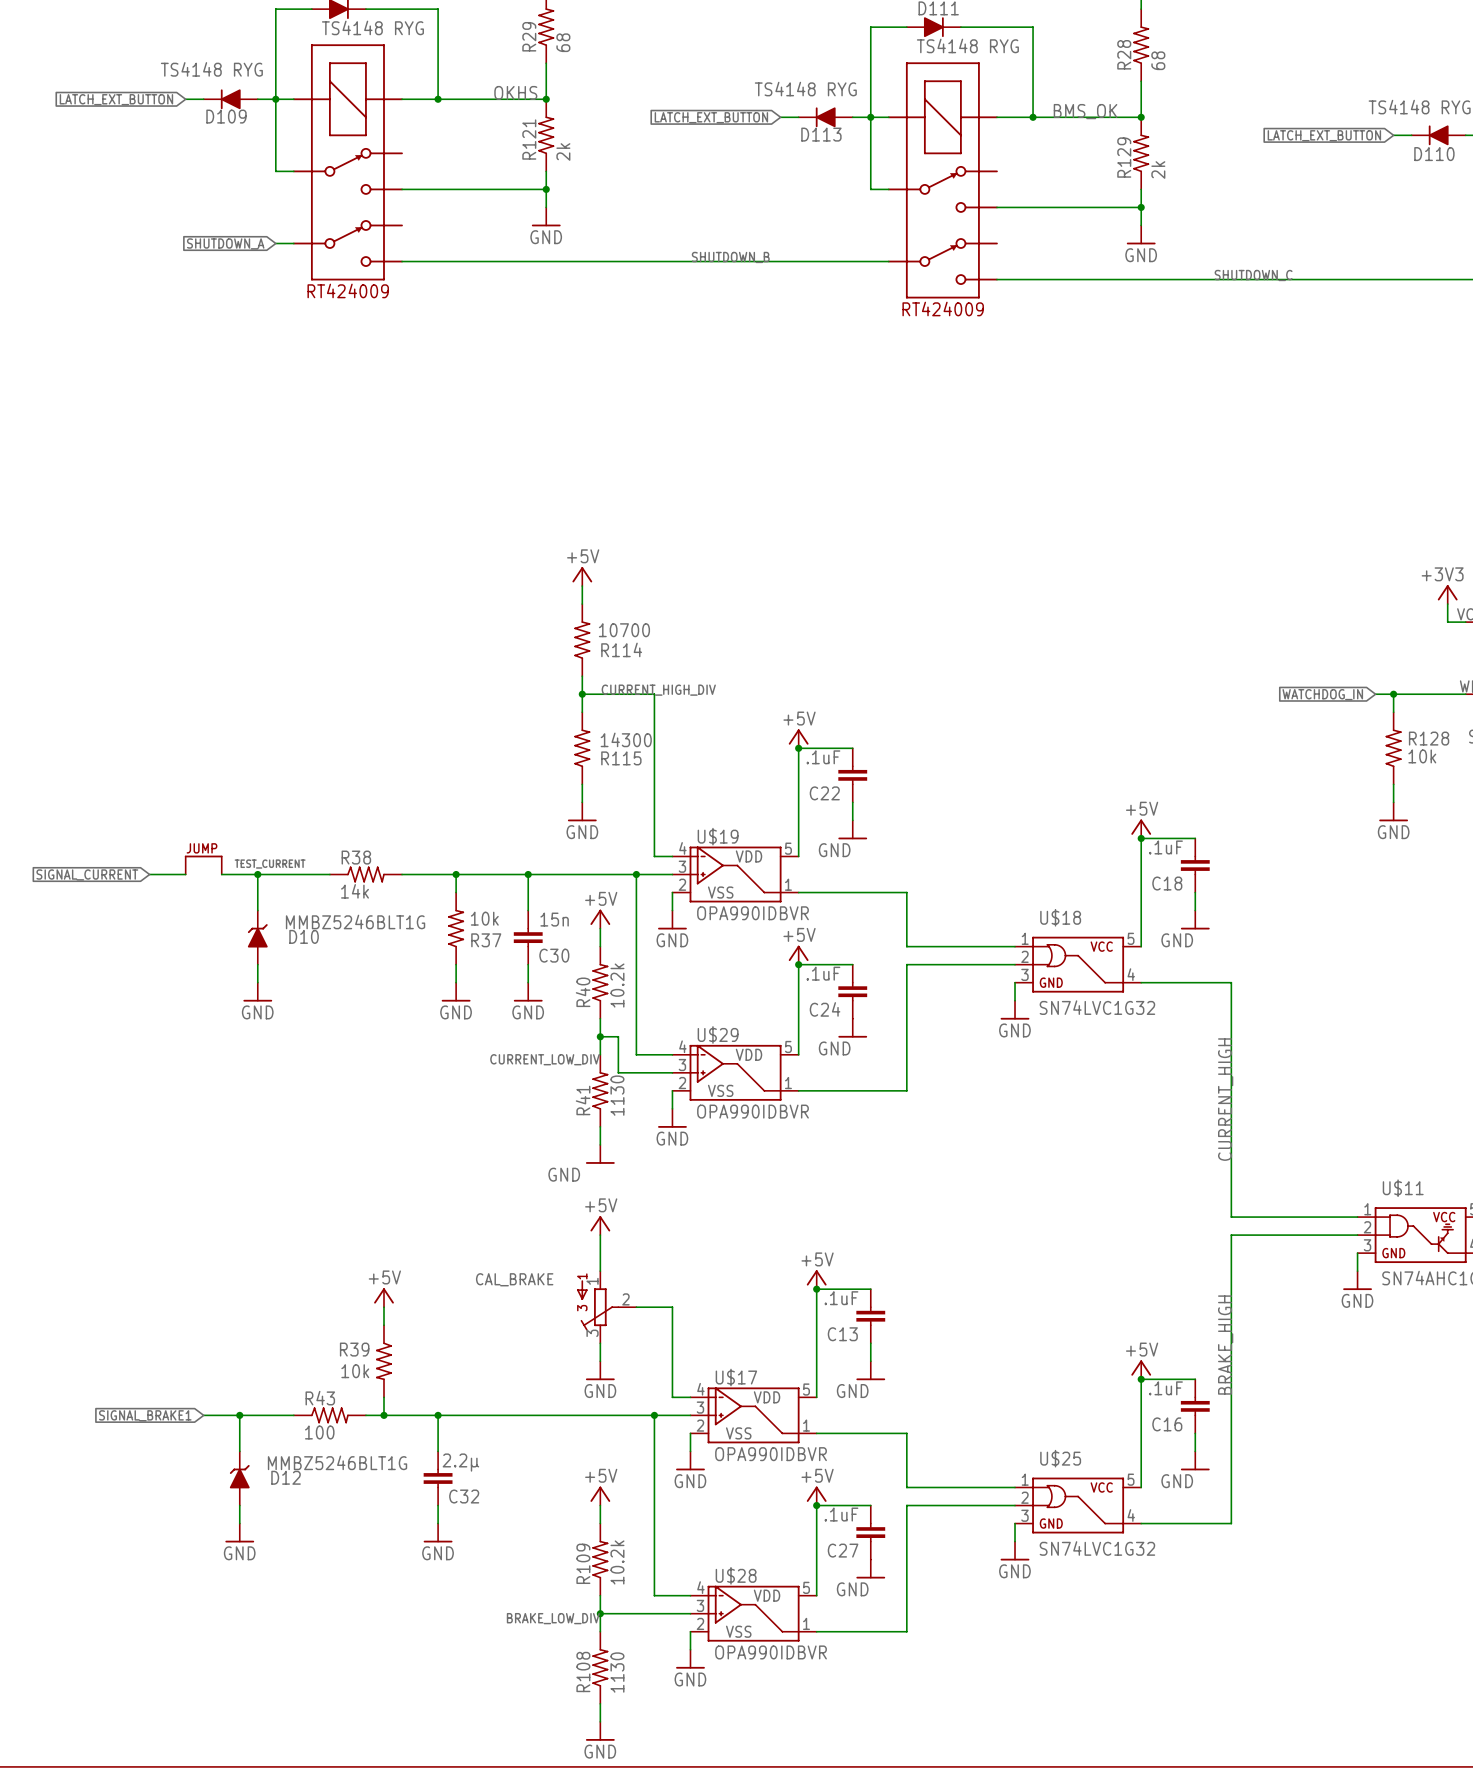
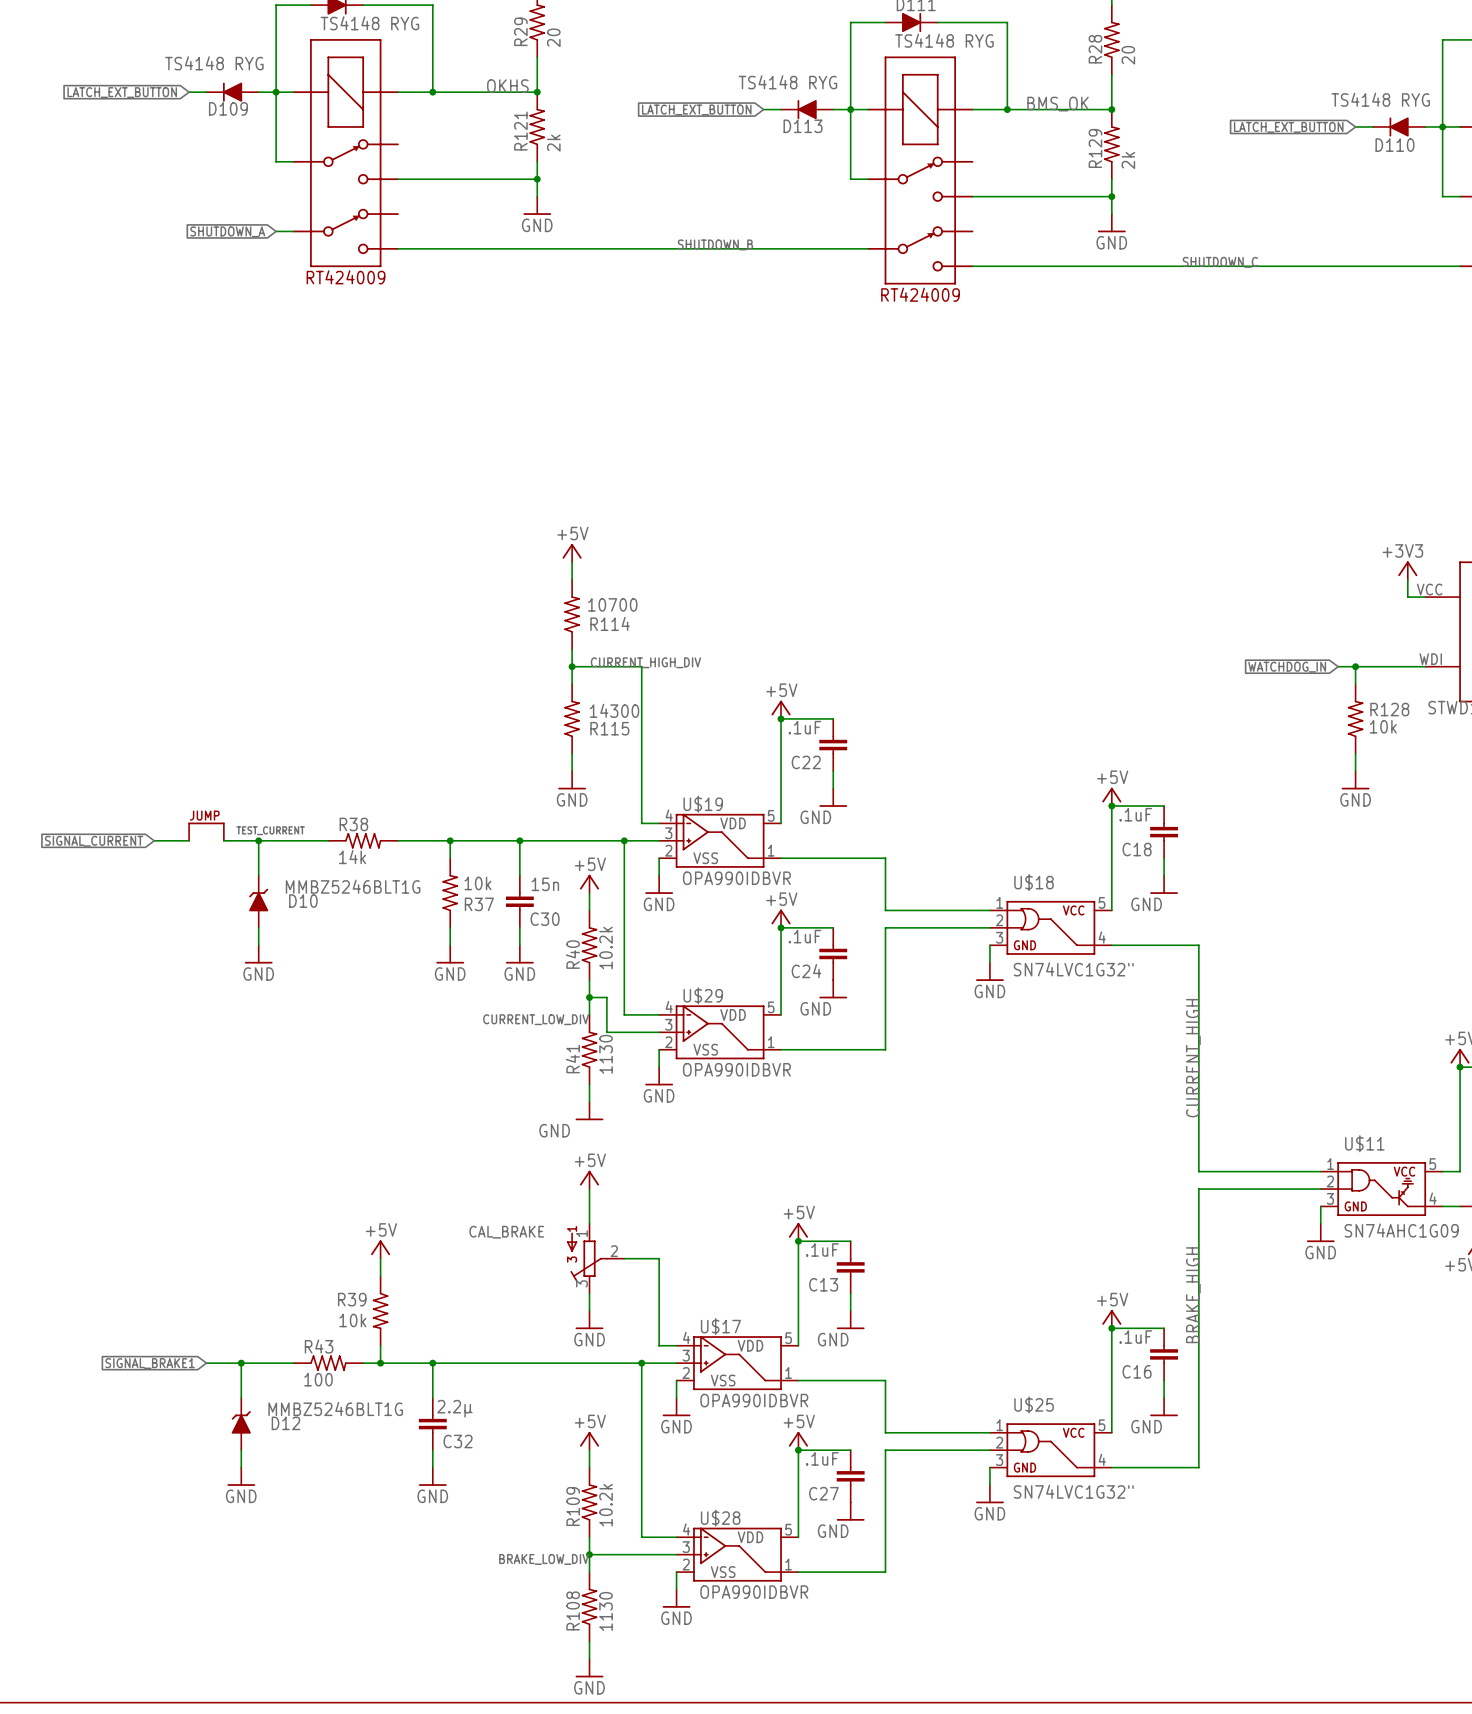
R29 value: 68 (563, 42) -> 20 (553, 37)
R28 value: 68 (1158, 60) -> 20 (1128, 55)
U$18 value: SN74LVC1G32 (1097, 1007) -> SN74LVC1G32" (1073, 969)
U$25 value: SN74LVC1G32 (1097, 1548) -> SN74LVC1G32" (1073, 1491)

